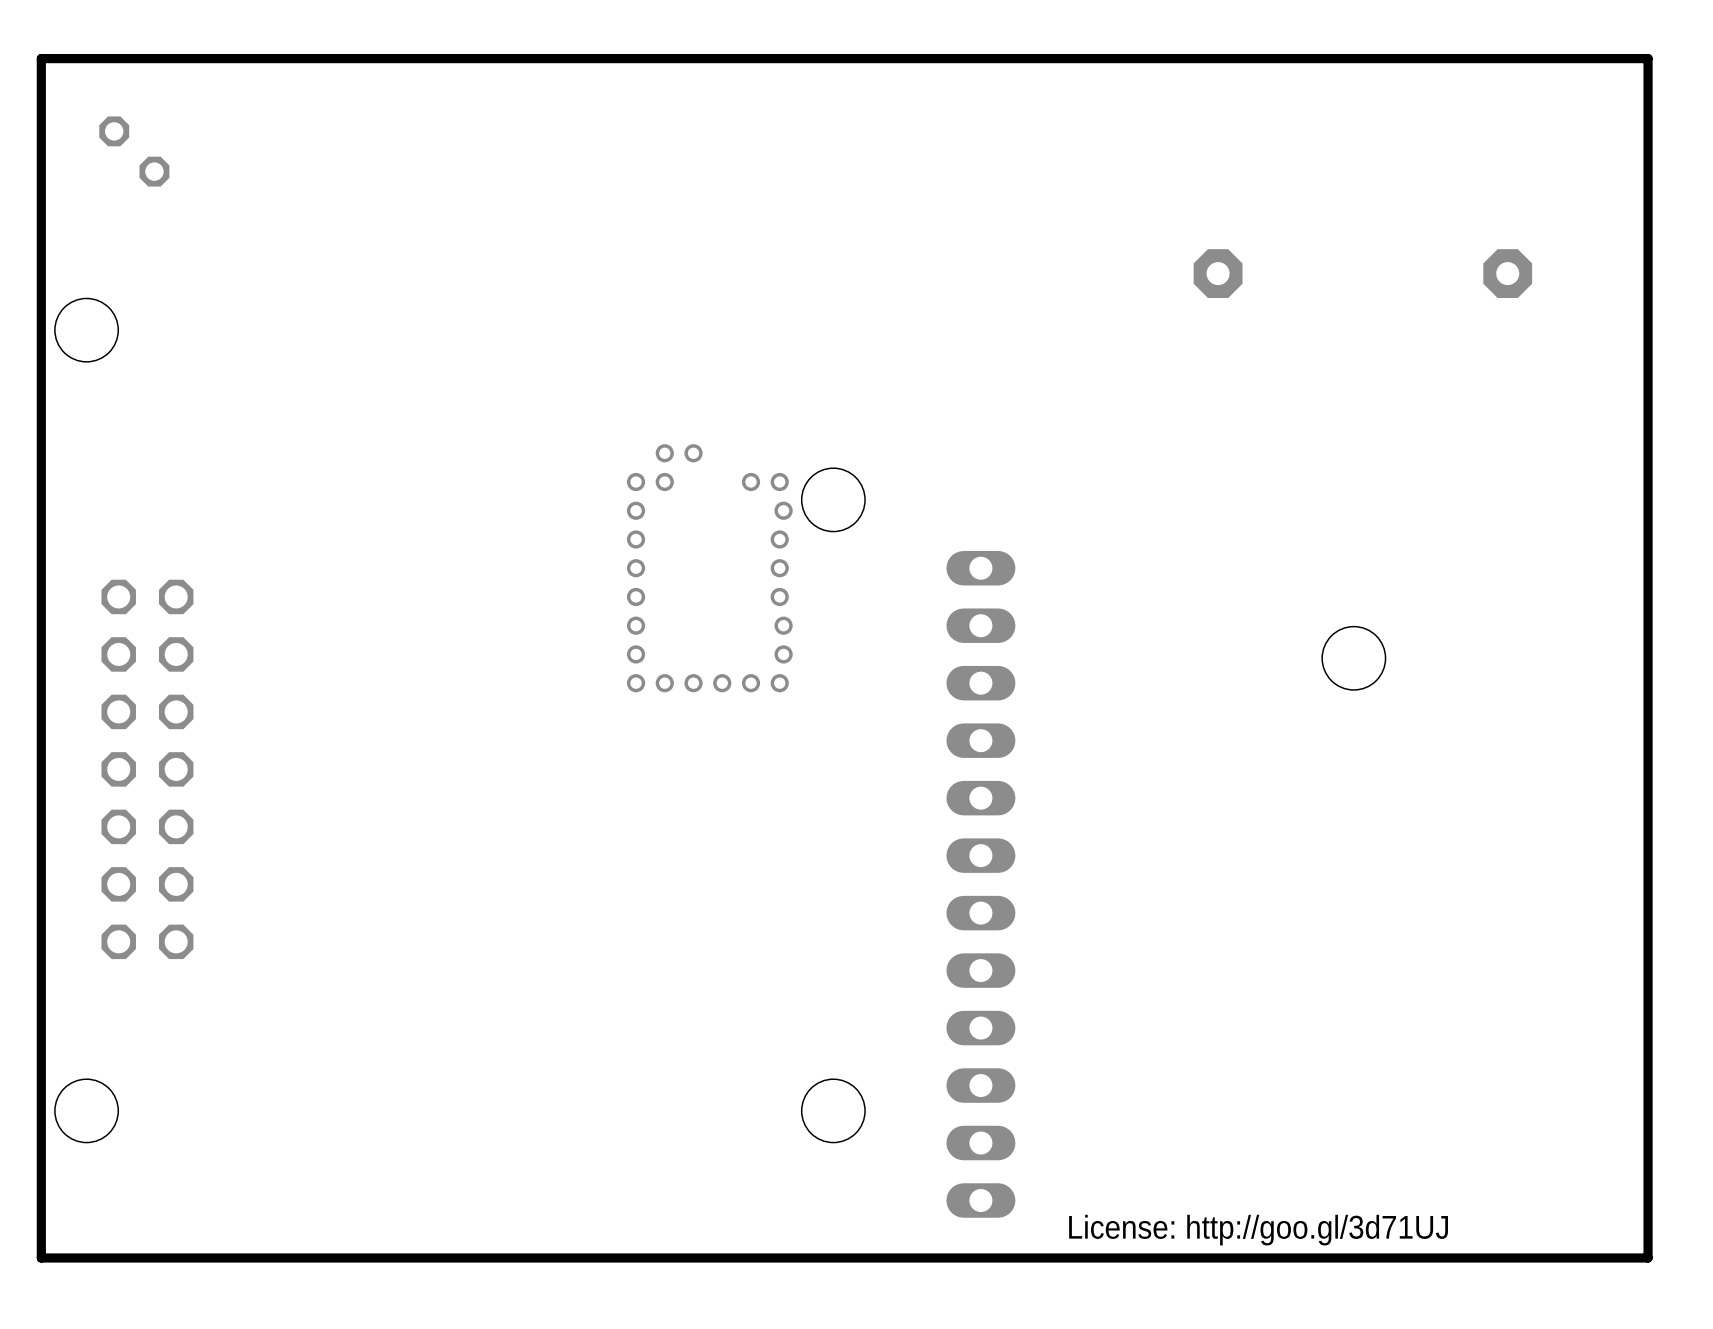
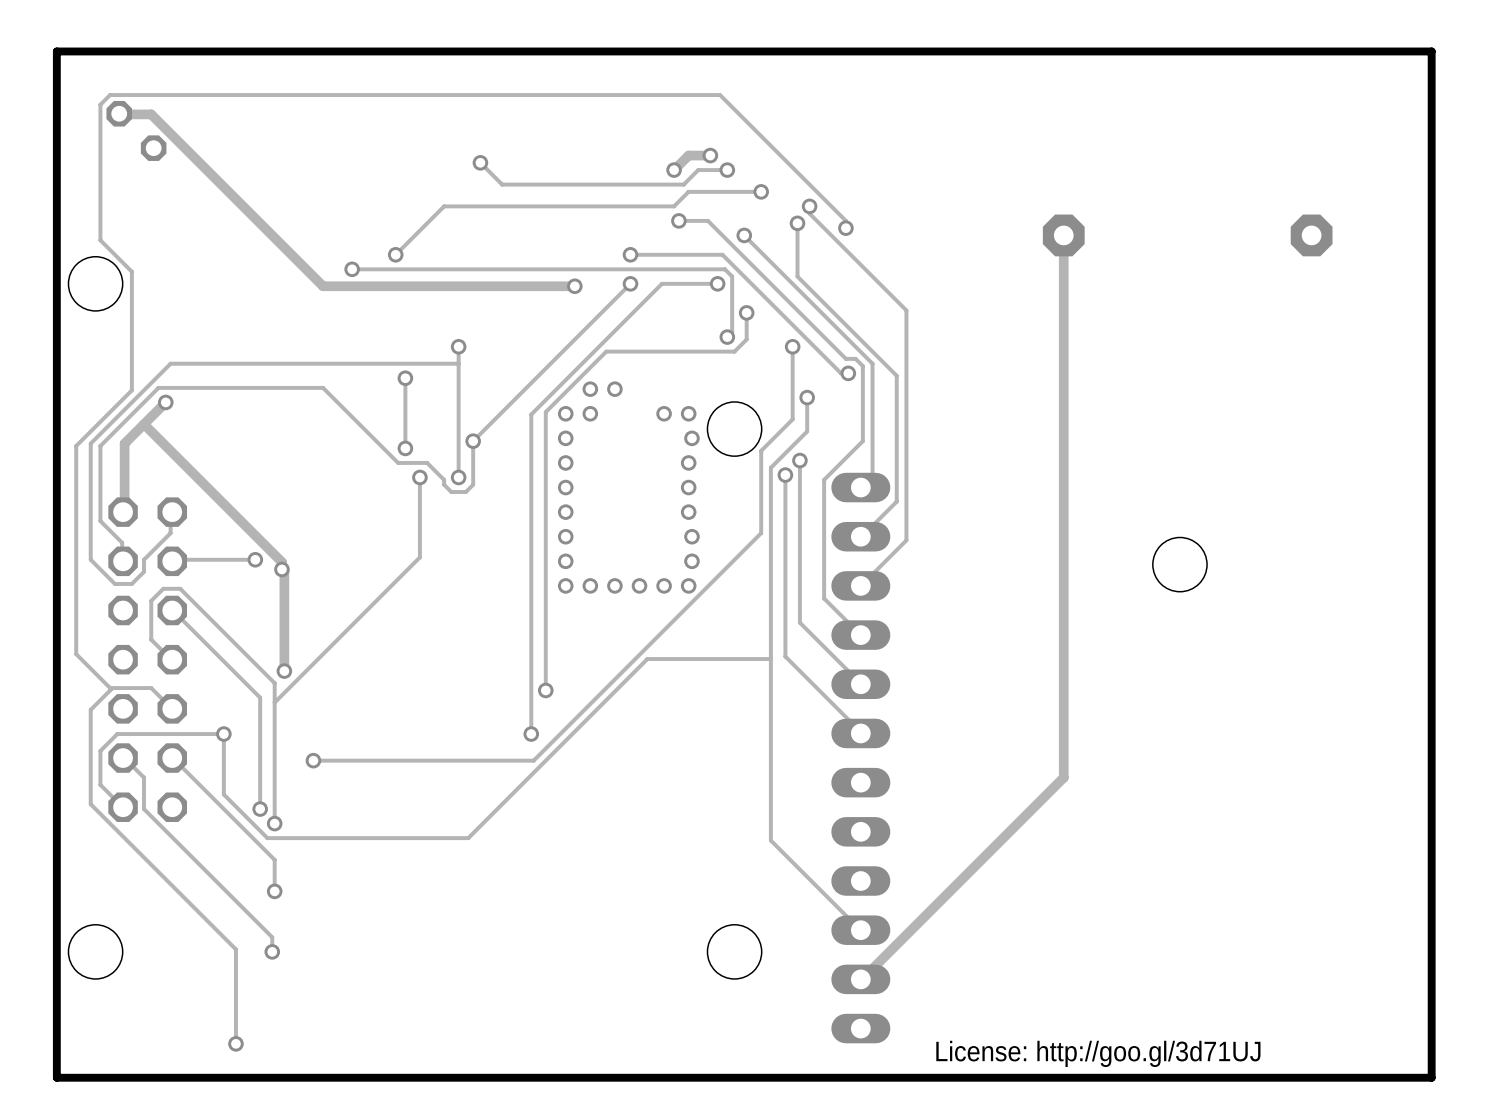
track: none -> (119, 113) (151, 114) (323, 286) (574, 286)
track: none -> (710, 155) (688, 155) (674, 170)
via: none -> (710, 155)
track: none -> (480, 162) (502, 184) (683, 184) (698, 170) (727, 170)
via: none -> (480, 162)
via: none -> (674, 170)
via: none -> (727, 170)
track: none -> (761, 191) (688, 191) (674, 206) (444, 206) (395, 254)
via: none -> (761, 191)
track: none -> (809, 206) (809, 213) (906, 310) (906, 540) (860, 585)
via: none -> (809, 206)
track: none -> (678, 220) (707, 220) (845, 358) (855, 358) (862, 366) (862, 441) (824, 479) (824, 598) (860, 635)
via: none -> (678, 220)
track: none -> (797, 223) (797, 276) (896, 375) (896, 501) (860, 536)
via: none -> (797, 223)
track: none -> (845, 228) (845, 220) (720, 95) (110, 95) (100, 104) (100, 240) (131, 271) (131, 390) (76, 446) (76, 654) (111, 689)
via: none -> (845, 228)
track: none -> (744, 235) (872, 363) (872, 477) (860, 487)
via: none -> (744, 235)
track: none -> (1063, 235) (1063, 777) (860, 979)
via: none -> (395, 254)
track: none -> (630, 254) (722, 254) (841, 373) (848, 373)
via: none -> (630, 254)
track: none -> (352, 269) (724, 269) (732, 276) (732, 332) (727, 337)
via: none -> (352, 269)
track: none -> (630, 283) (473, 441) (473, 484) (465, 491) (451, 491) (444, 484) (444, 479) (427, 462) (398, 462) (323, 387) (158, 387) (100, 446) (100, 521) (122, 542) (123, 561)
via: none -> (630, 283)
track: none -> (717, 283) (661, 283) (531, 414) (531, 734)
via: none -> (717, 283)
via: none -> (574, 286)
track: none -> (746, 312) (746, 339) (734, 351) (606, 351) (545, 412) (545, 690)
via: none -> (746, 312)
via: none -> (727, 337)
track: none -> (458, 346) (458, 477)
via: none -> (458, 346)
track: none -> (792, 346) (792, 419) (761, 450) (761, 533) (533, 760) (313, 760)
via: none -> (792, 346)
track: none -> (458, 363) (170, 363) (90, 443) (90, 559) (114, 583) (131, 583) (143, 571) (143, 559) (170, 533) (170, 513) (172, 512)
via: none -> (848, 373)
track: none -> (405, 378) (405, 448)
via: none -> (405, 378)
track: none -> (807, 397) (807, 431) (770, 467) (770, 840) (860, 930)
via: none -> (807, 397)
track: none -> (165, 402) (124, 443) (124, 511) (123, 512)
via: none -> (165, 402)
track: none -> (143, 424) (281, 562) (281, 569) (284, 571) (284, 671)
via: none -> (473, 441)
via: none -> (405, 448)
track: none -> (799, 460) (799, 622) (860, 684)
via: none -> (799, 460)
track: none -> (785, 475) (785, 656) (860, 733)
via: none -> (785, 475)
track: none -> (419, 477) (419, 557) (274, 702)
via: none -> (419, 477)
via: none -> (458, 477)
track: none -> (255, 559) (173, 559) (172, 561)
via: none -> (255, 559)
via: none -> (281, 569)
track: none -> (172, 610) (260, 697) (260, 809)
track: none -> (770, 659) (647, 659) (468, 838) (267, 838) (223, 794) (223, 734) (117, 734) (100, 750) (100, 784) (123, 807)
track: none -> (172, 659) (151, 639) (151, 600) (163, 588) (180, 588) (274, 683) (274, 823)
via: none -> (284, 671)
via: none -> (545, 690)
track: none -> (172, 708) (151, 688) (112, 688) (90, 709) (90, 804) (235, 949) (235, 1043)
via: none -> (223, 734)
via: none -> (531, 734)
track: none -> (123, 758) (143, 777) (143, 809) (272, 937) (272, 951)
track: none -> (172, 758) (274, 859) (274, 891)
via: none -> (313, 760)
via: none -> (260, 809)
via: none -> (274, 823)
via: none -> (274, 891)
via: none -> (272, 951)
via: none -> (235, 1043)

